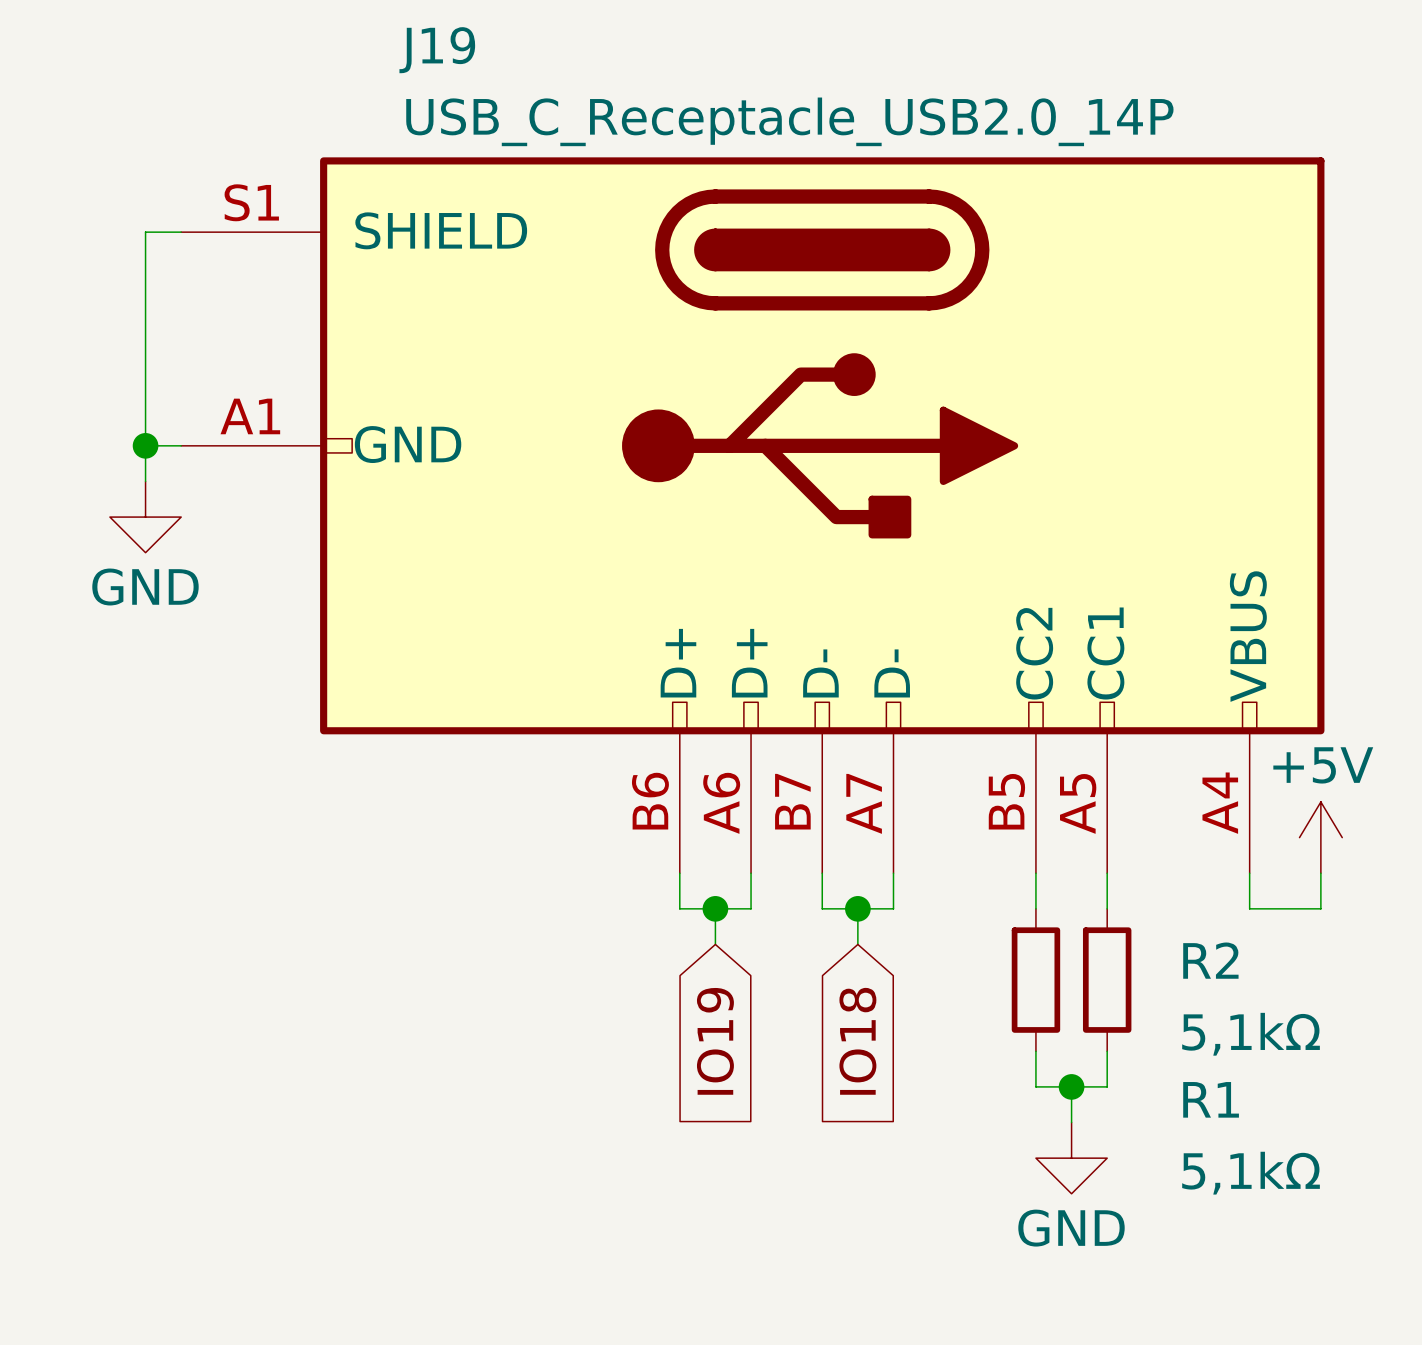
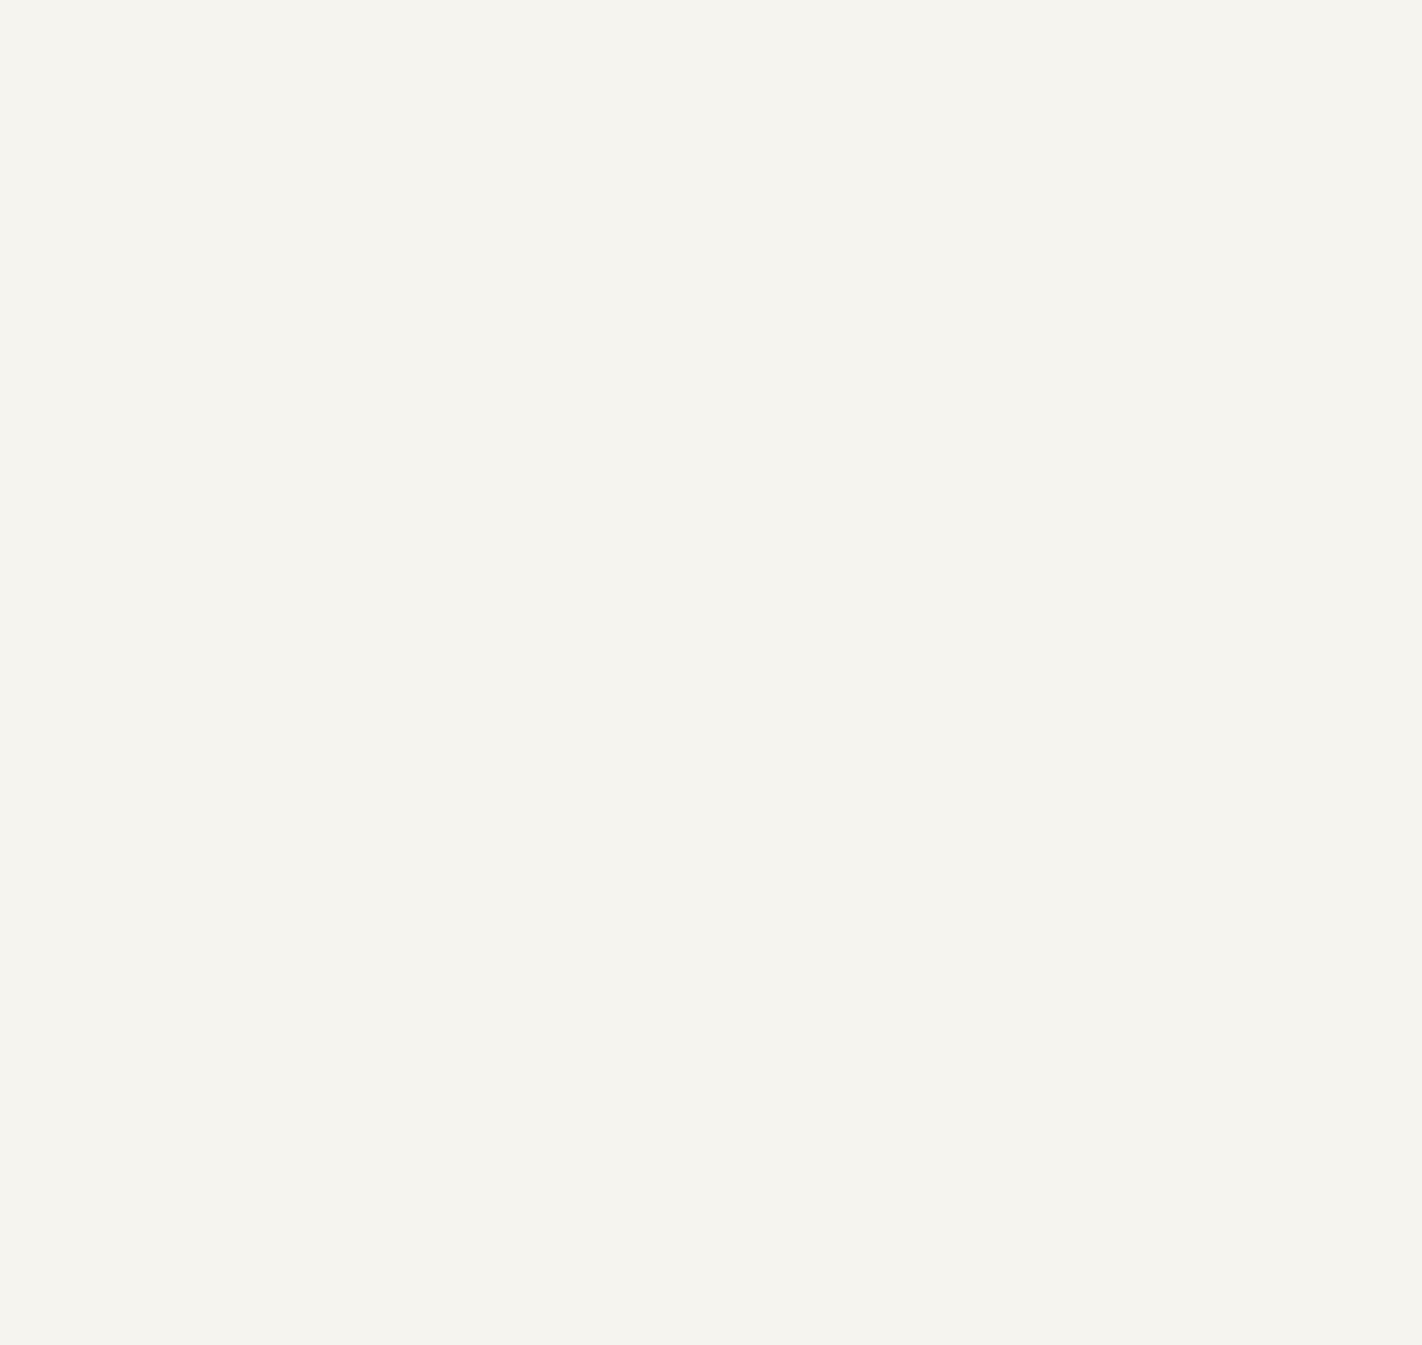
wire: (181, 232) (145, 232) (145, 481) -> none
wire: (145, 445) (181, 445) -> none
junction: (145, 445) -> none
J19: USB_C_Receptacle_USB2.0_14P (752, 515) -> none
power symbol: GND (145, 517) -> none
power symbol: +5V (1320, 837) -> none
wire: (679, 873) (679, 908) (751, 908) (751, 873) -> none
wire: (822, 873) (822, 908) (893, 908) (893, 873) -> none
wire: (1035, 873) (1035, 908) -> none
wire: (1107, 873) (1107, 908) -> none
wire: (1249, 873) (1249, 908) (1320, 908) (1320, 873) -> none
wire: (715, 908) (715, 944) -> none
junction: (715, 908) -> none
wire: (857, 908) (857, 944) -> none
junction: (857, 908) -> none
R1: 5,1kΩ (1035, 980) -> none
R2: 5,1kΩ (1107, 980) -> none
global label: IO19 (715, 1041) -> none
global label: IO18 (857, 1041) -> none
wire: (1035, 1051) (1035, 1086) (1107, 1086) (1107, 1051) -> none
wire: (1071, 1086) (1071, 1122) -> none
junction: (1071, 1086) -> none
power symbol: GND (1071, 1158) -> none

